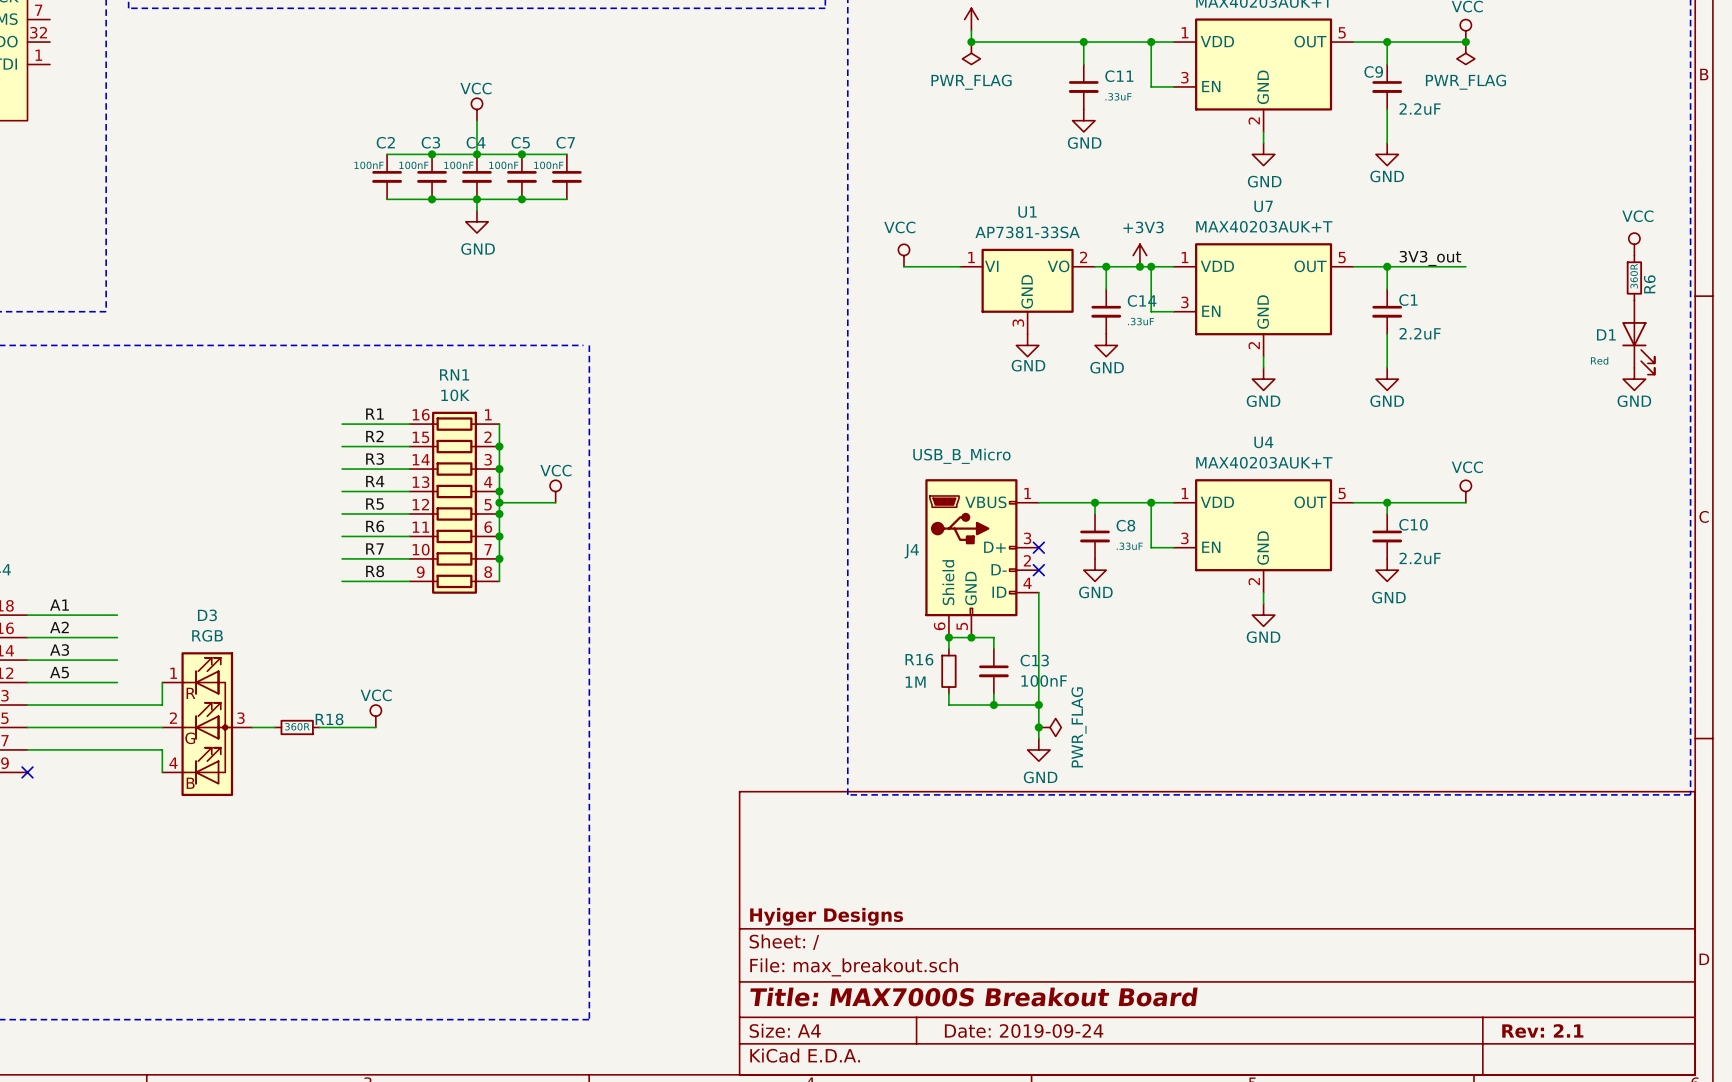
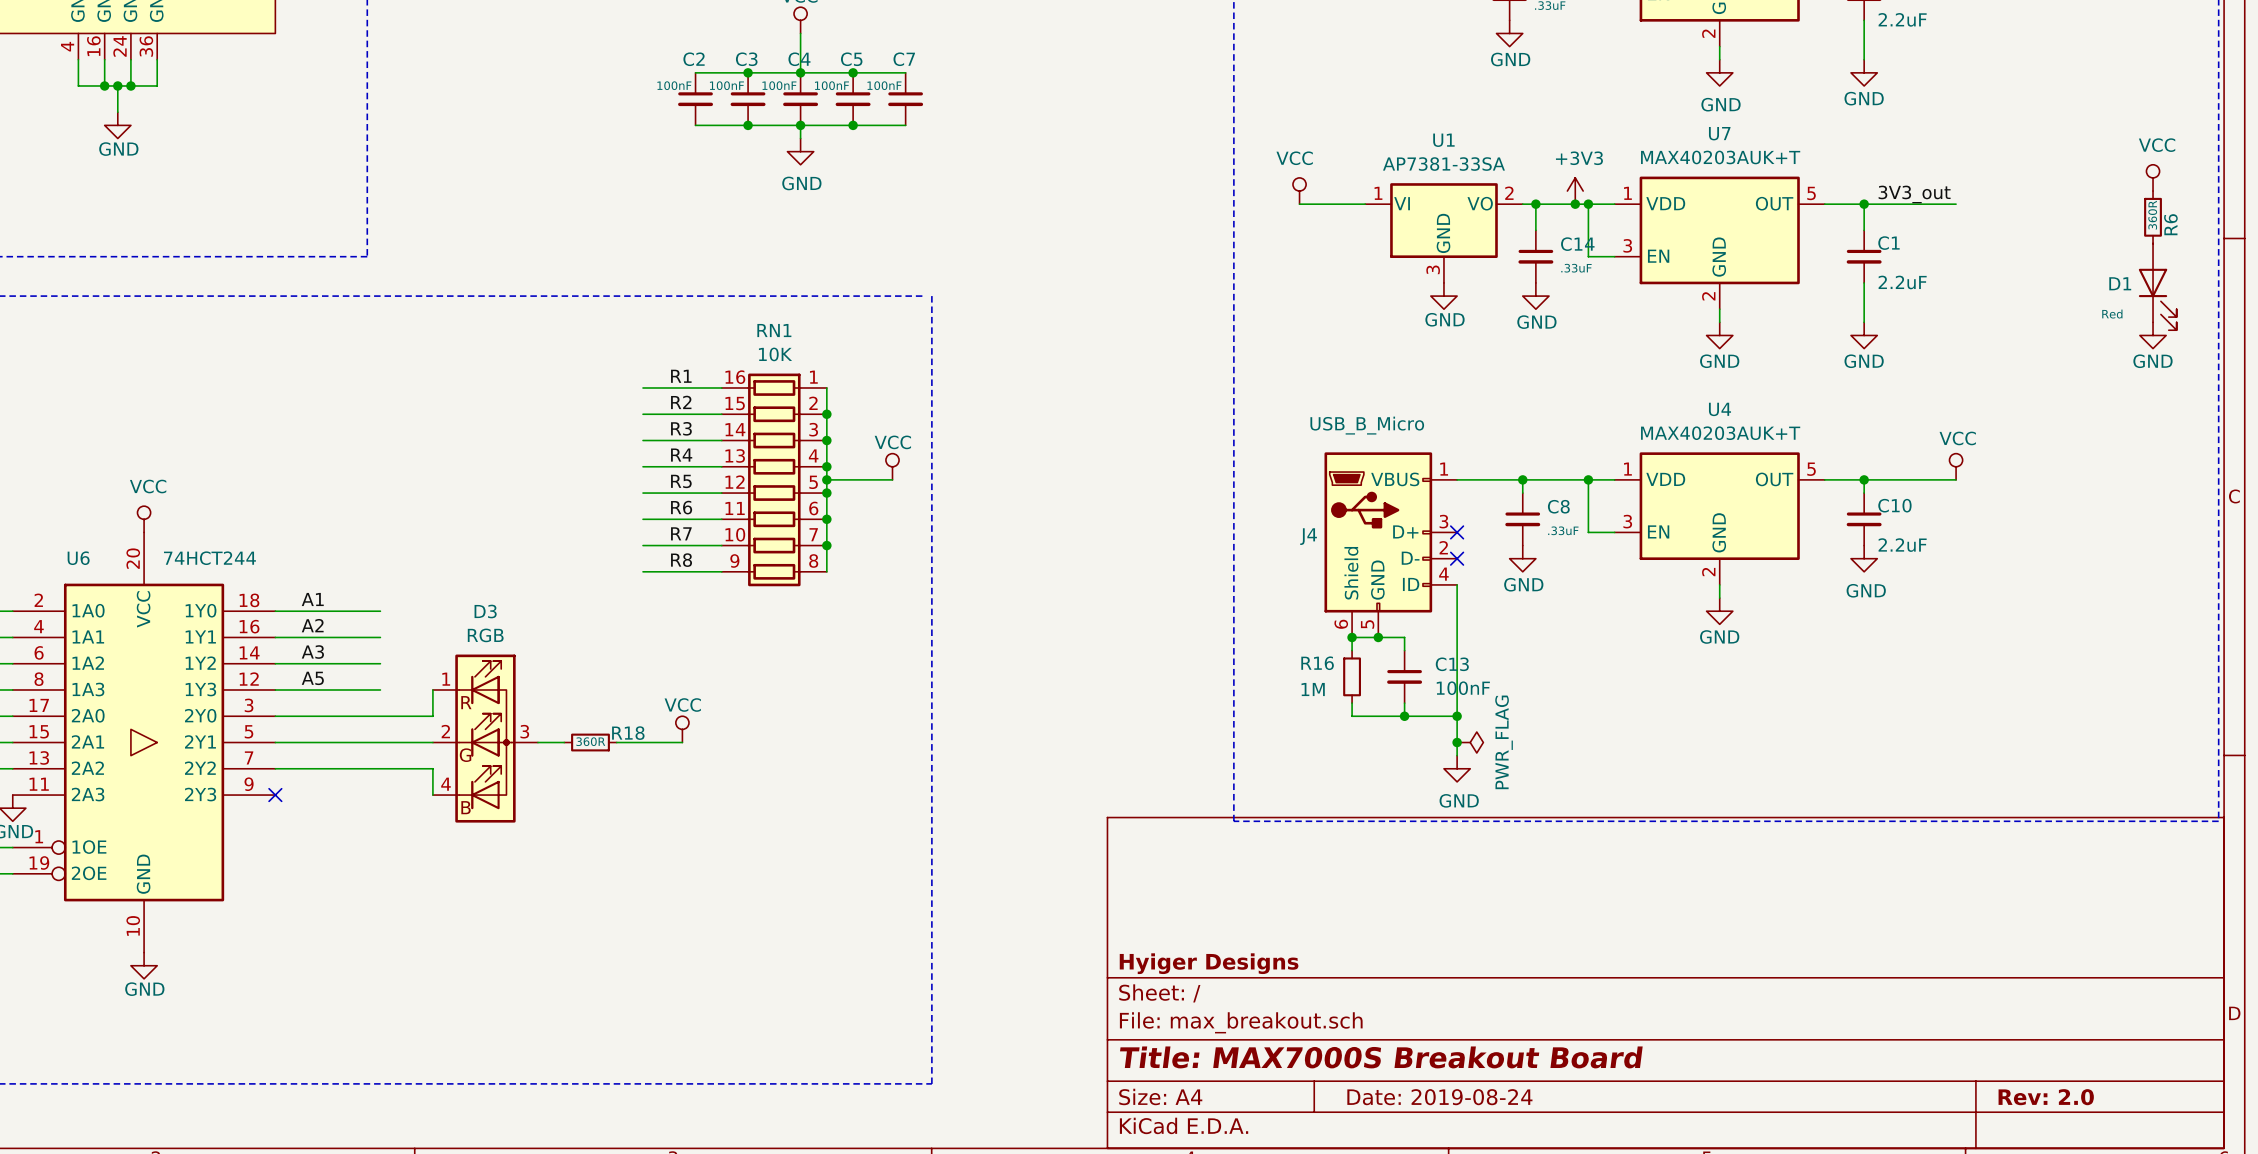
title block: Date: 2019-09-24 (1024, 1030) -> Date: 2019-08-24 (1439, 1097)
title block: Rev: 2.1 (1542, 1030) -> Rev: 2.0 (2046, 1097)

